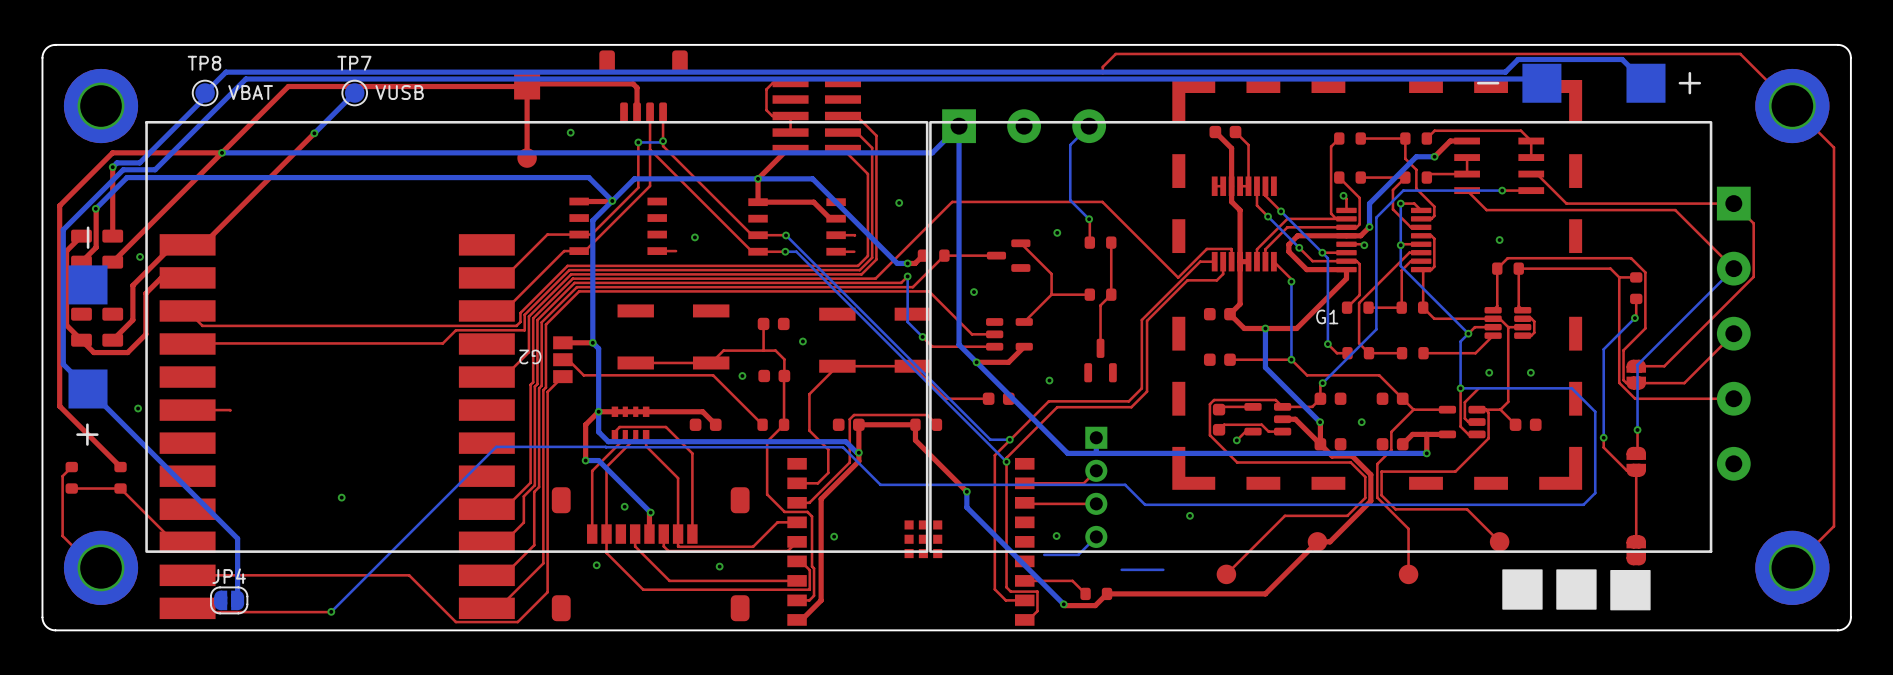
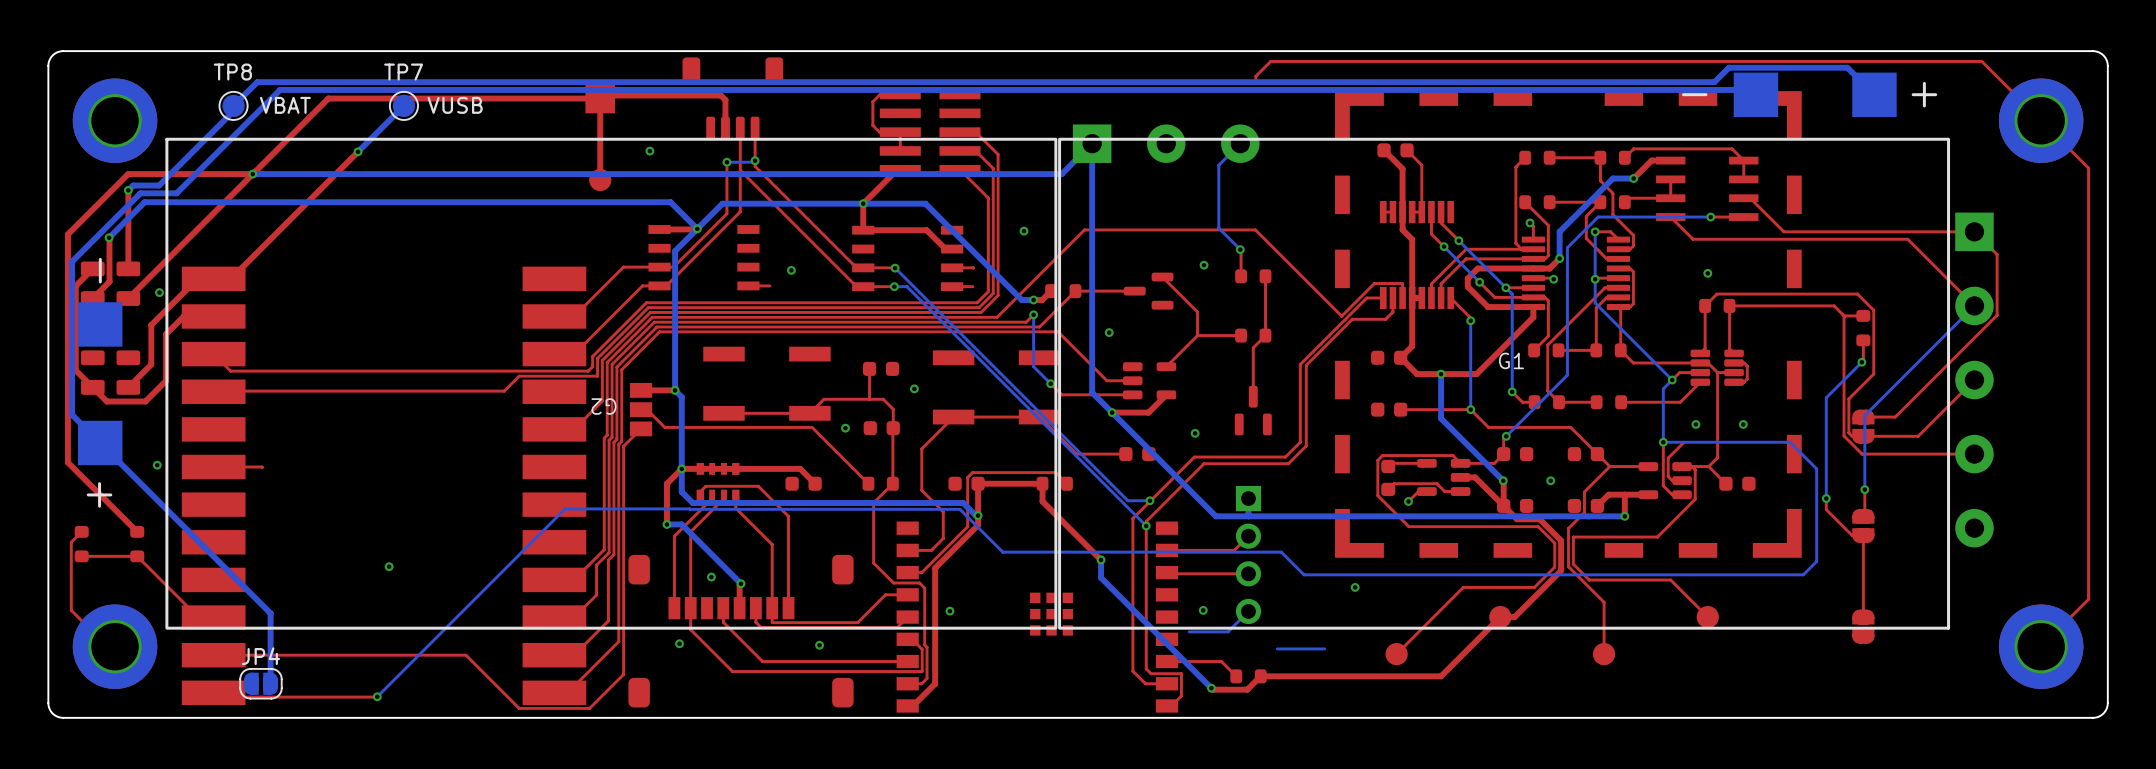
drawing: [1502, 569, 1651, 611] -> none

